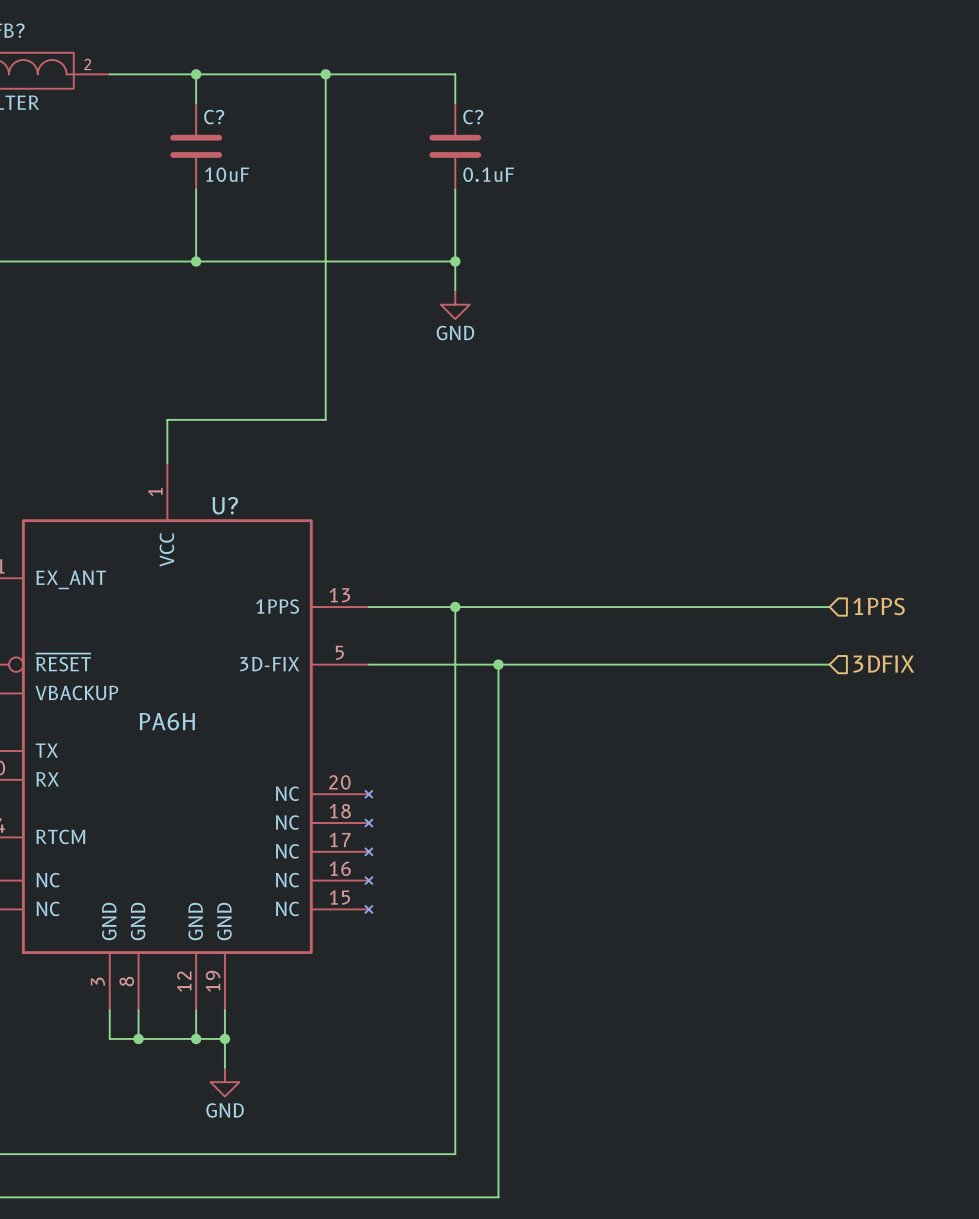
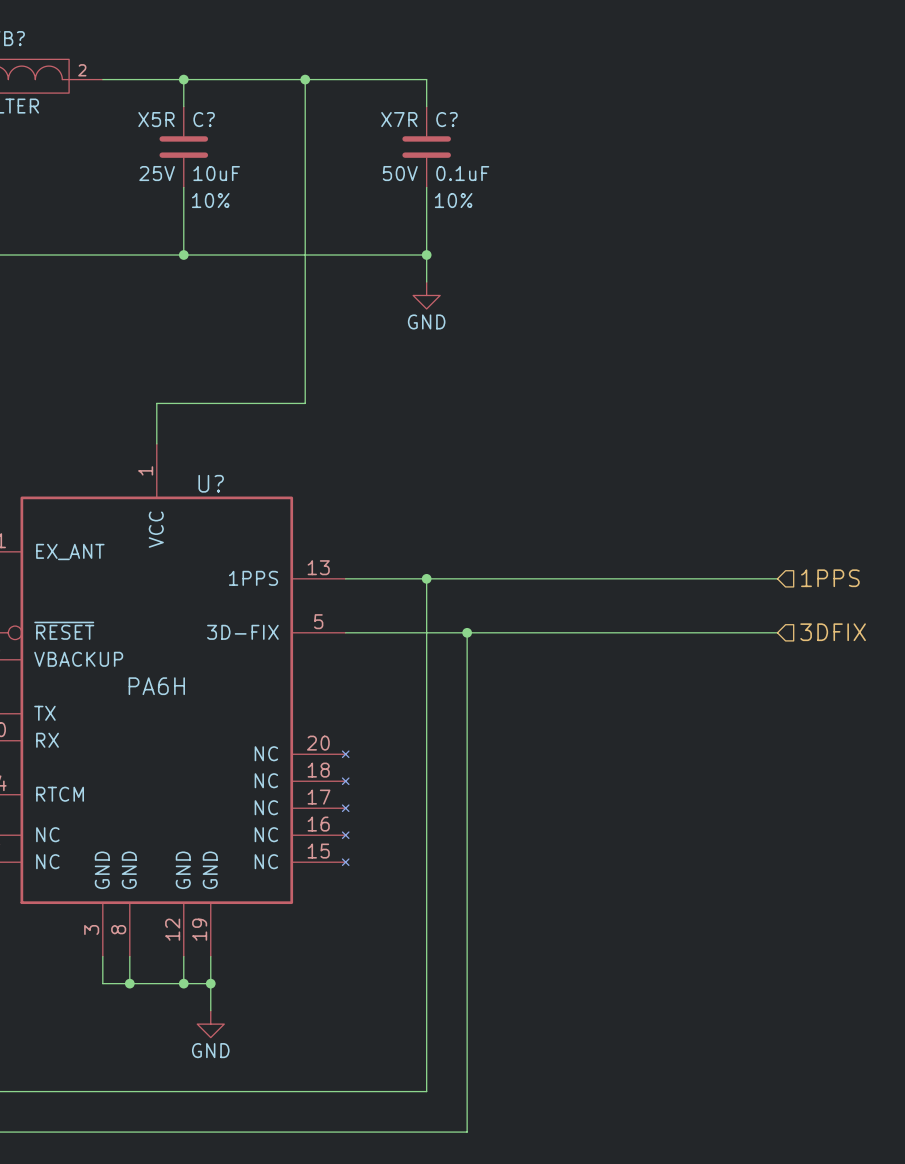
C? text: none -> X5R (156, 119)
C? text: none -> X7R (399, 119)
C? text: none -> 25V (157, 173)
C? text: none -> 50V (400, 173)
C? text: none -> 10% (210, 200)
C? text: none -> 10% (453, 200)

